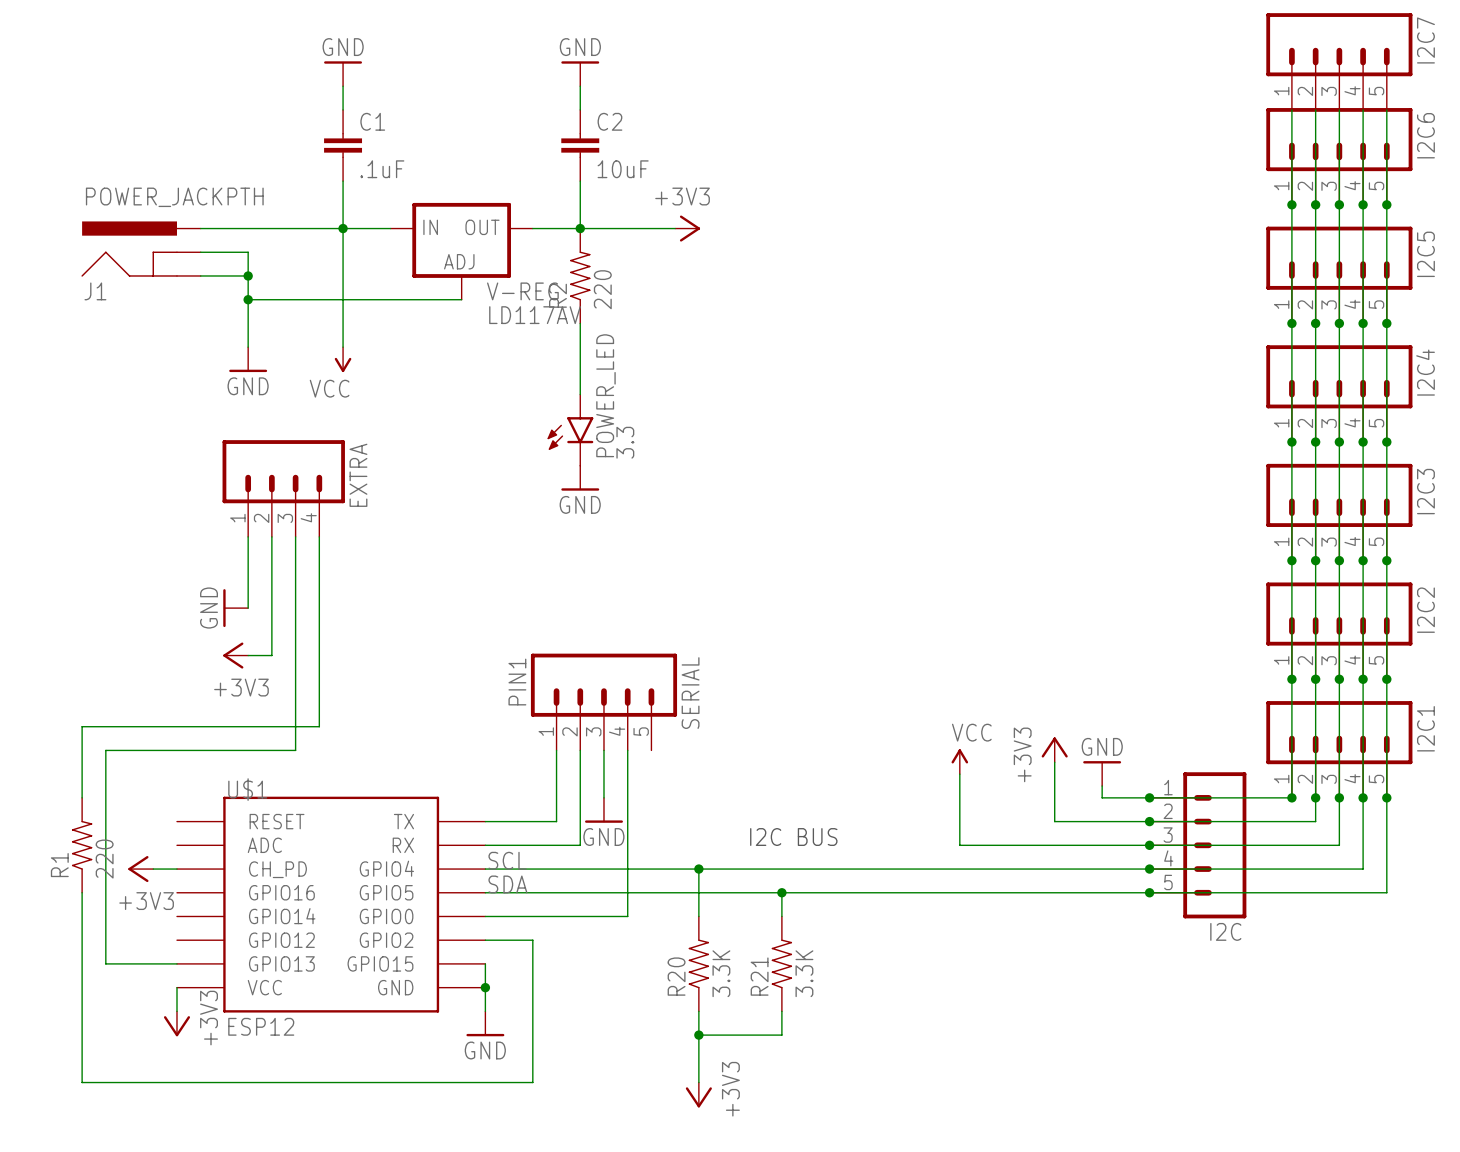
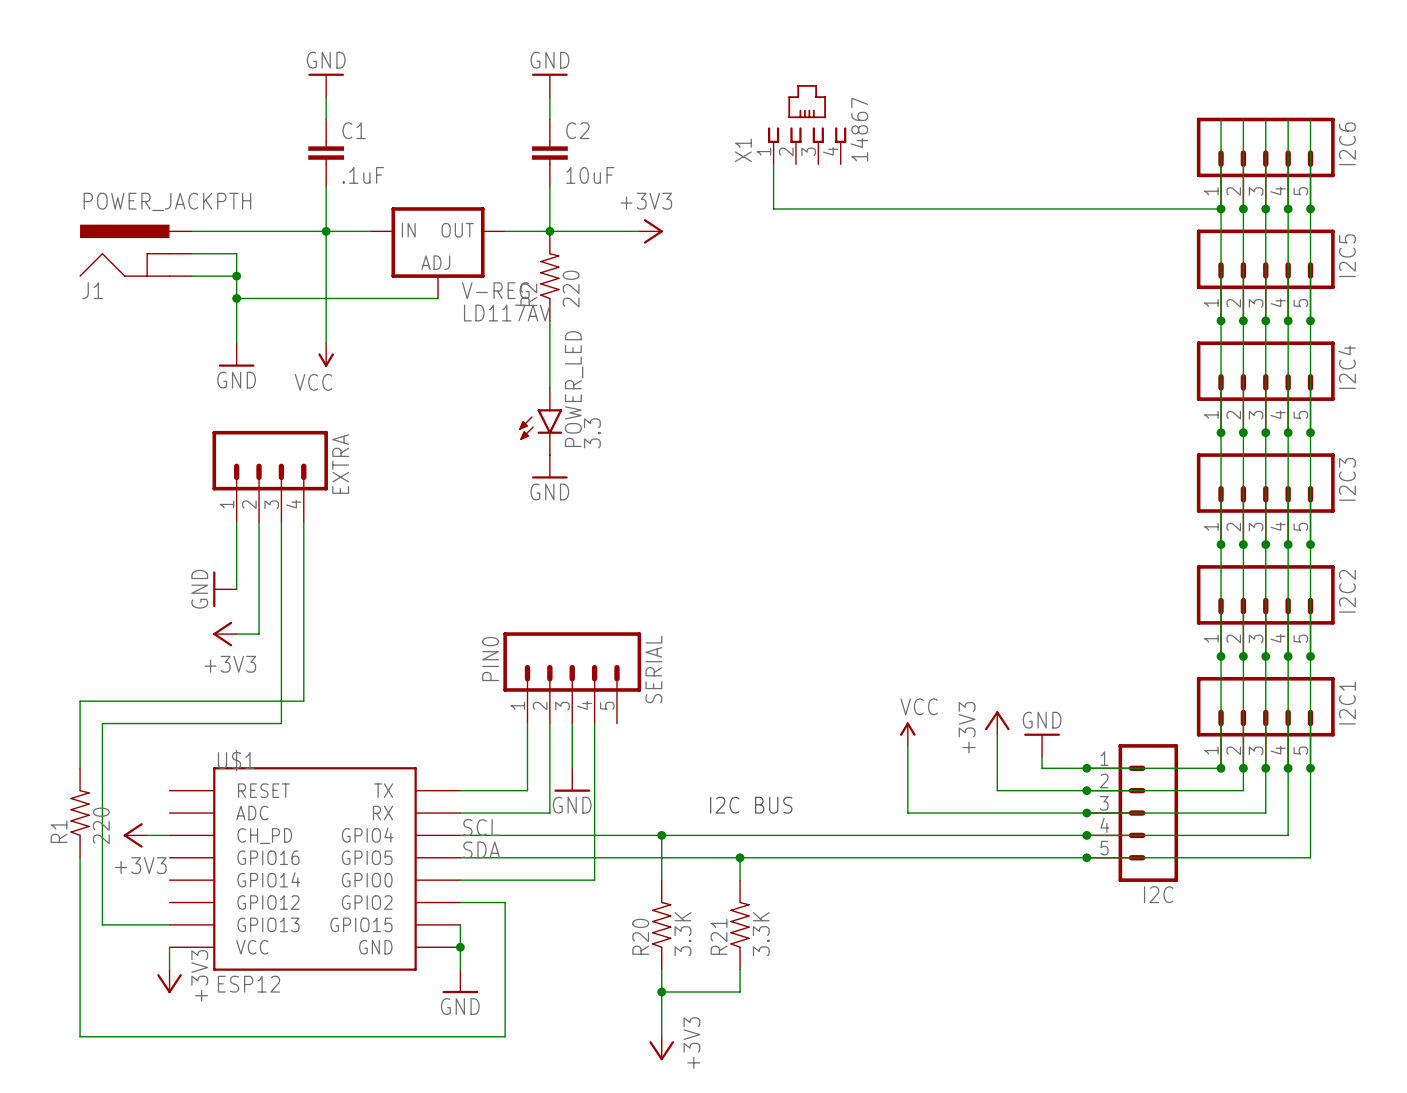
I2C7: (1339, 61) -> none
X1: none -> 14867 (807, 124)
wire: none -> (773, 164) (773, 208) (1221, 208)
SERIAL value: PIN1 (517, 682) -> PIN0 (490, 659)

